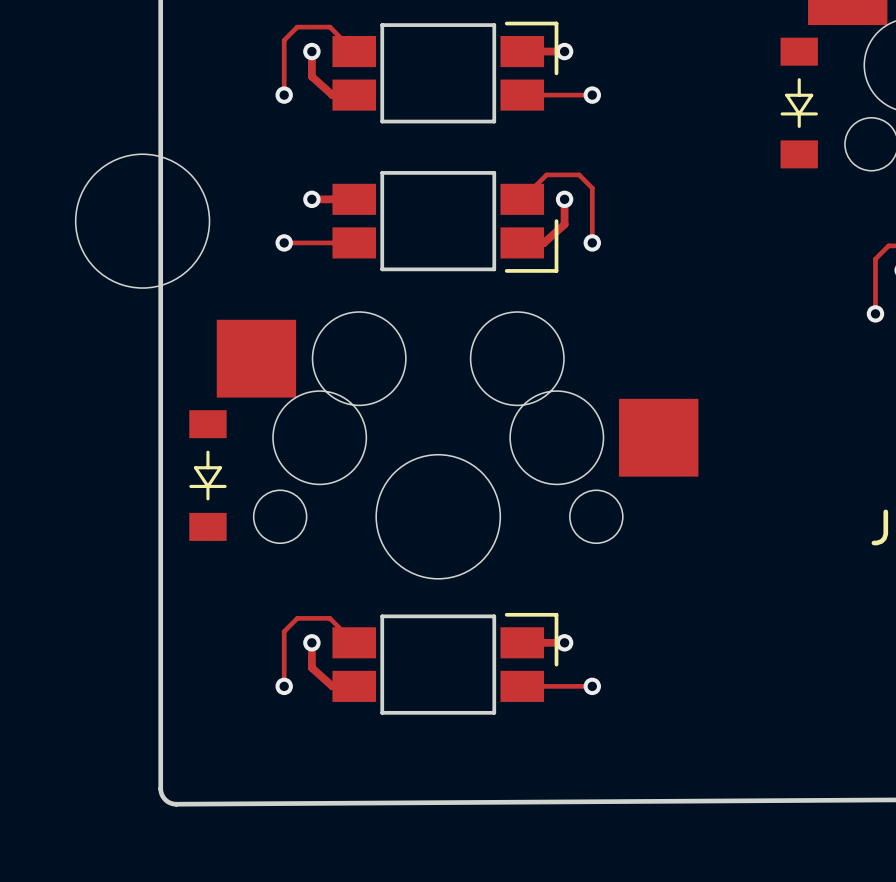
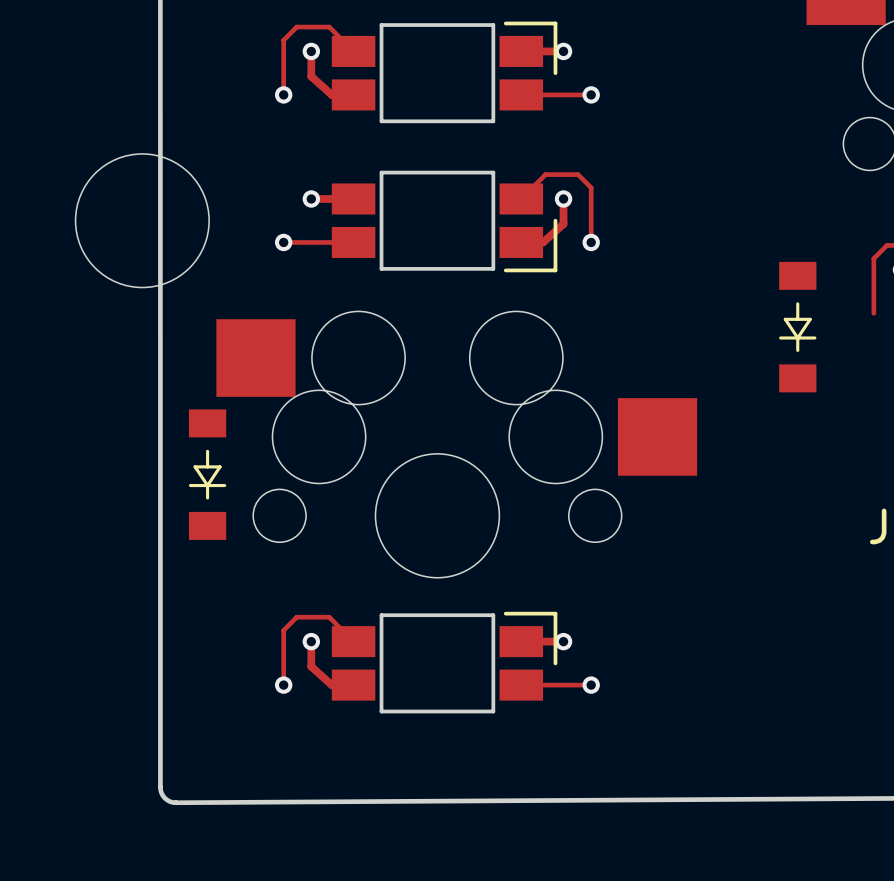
part position: (799, 103) -> (797, 327)
via: (875, 313) -> none

